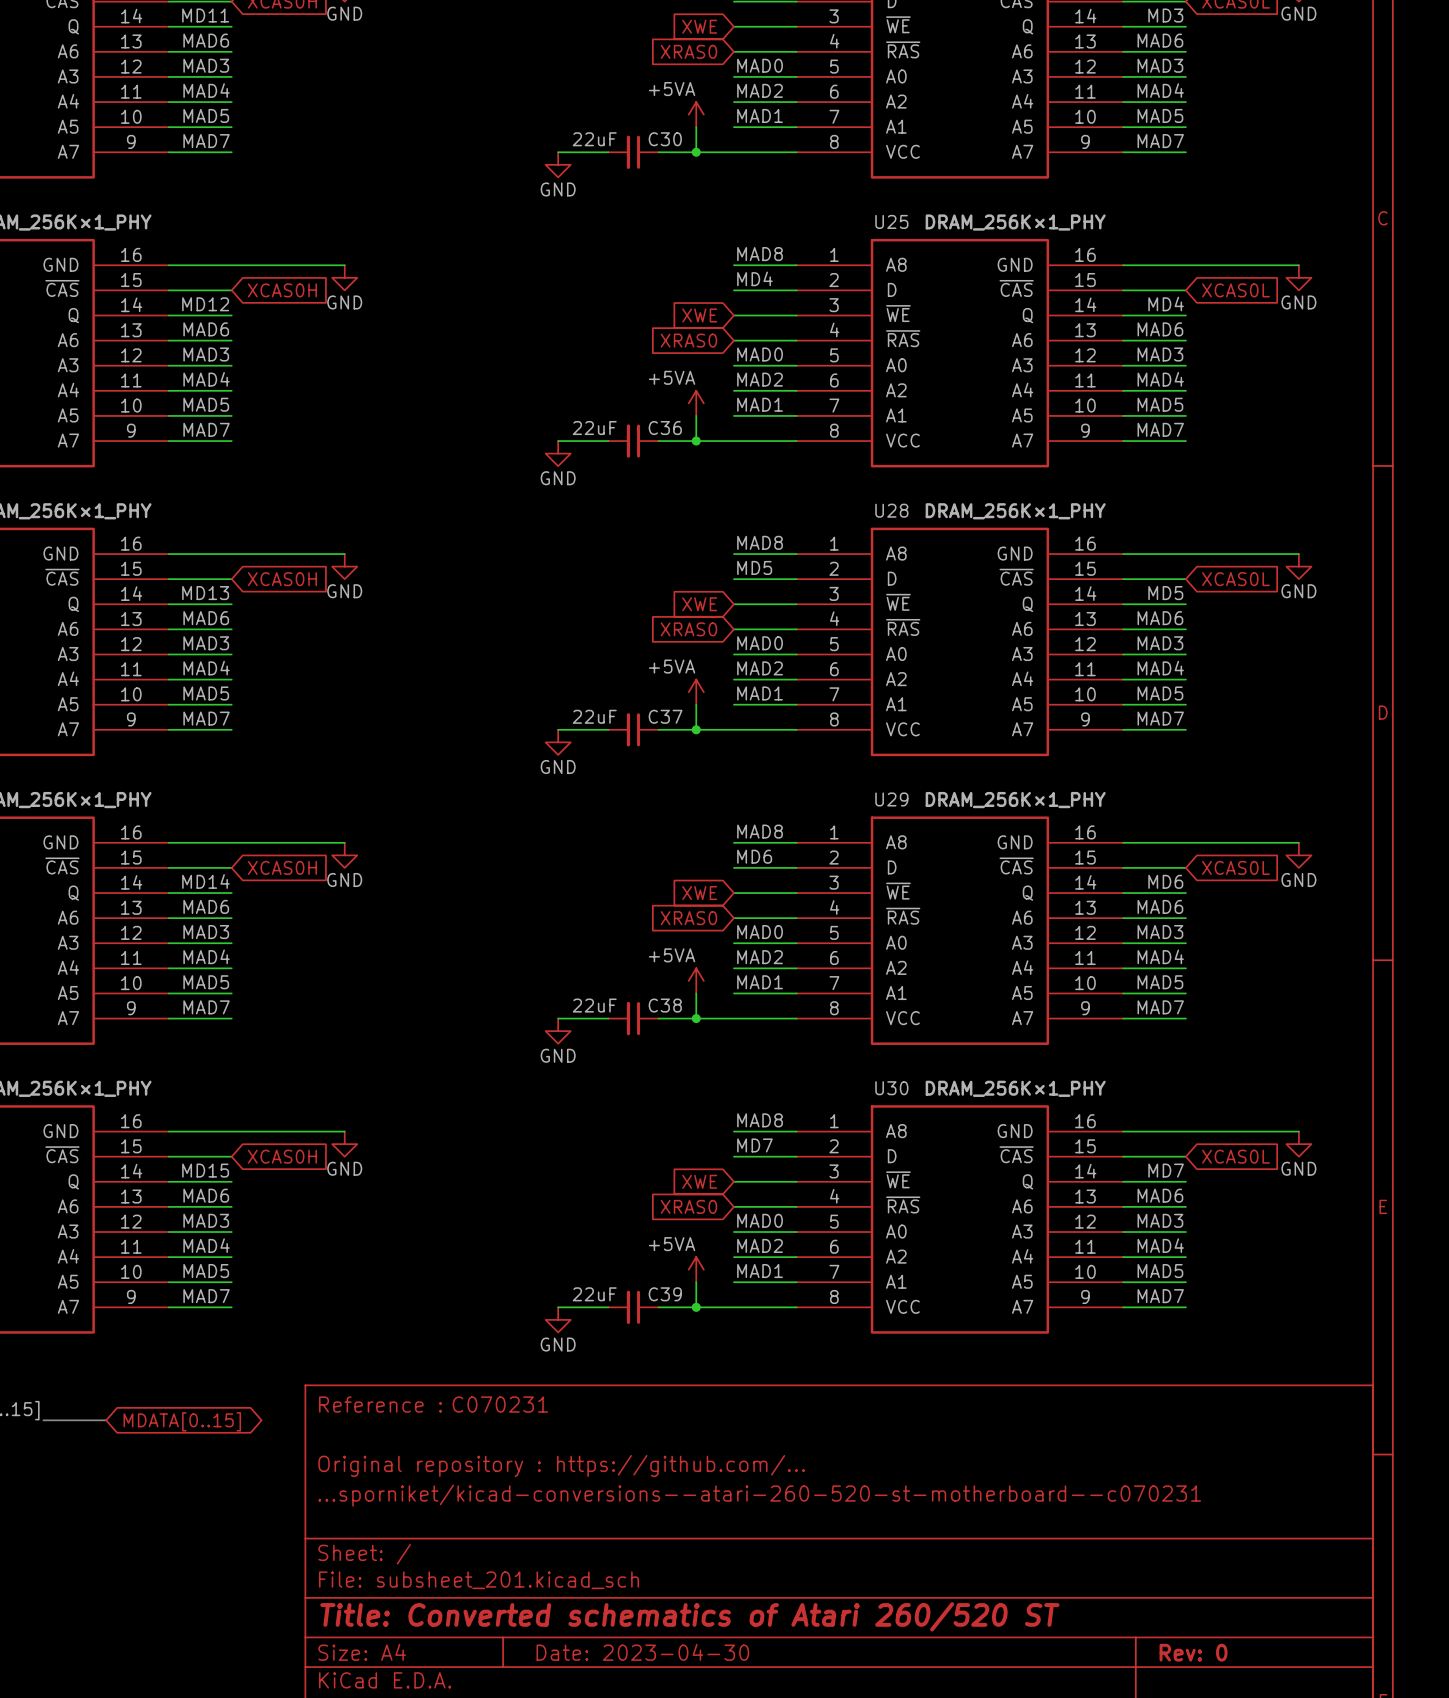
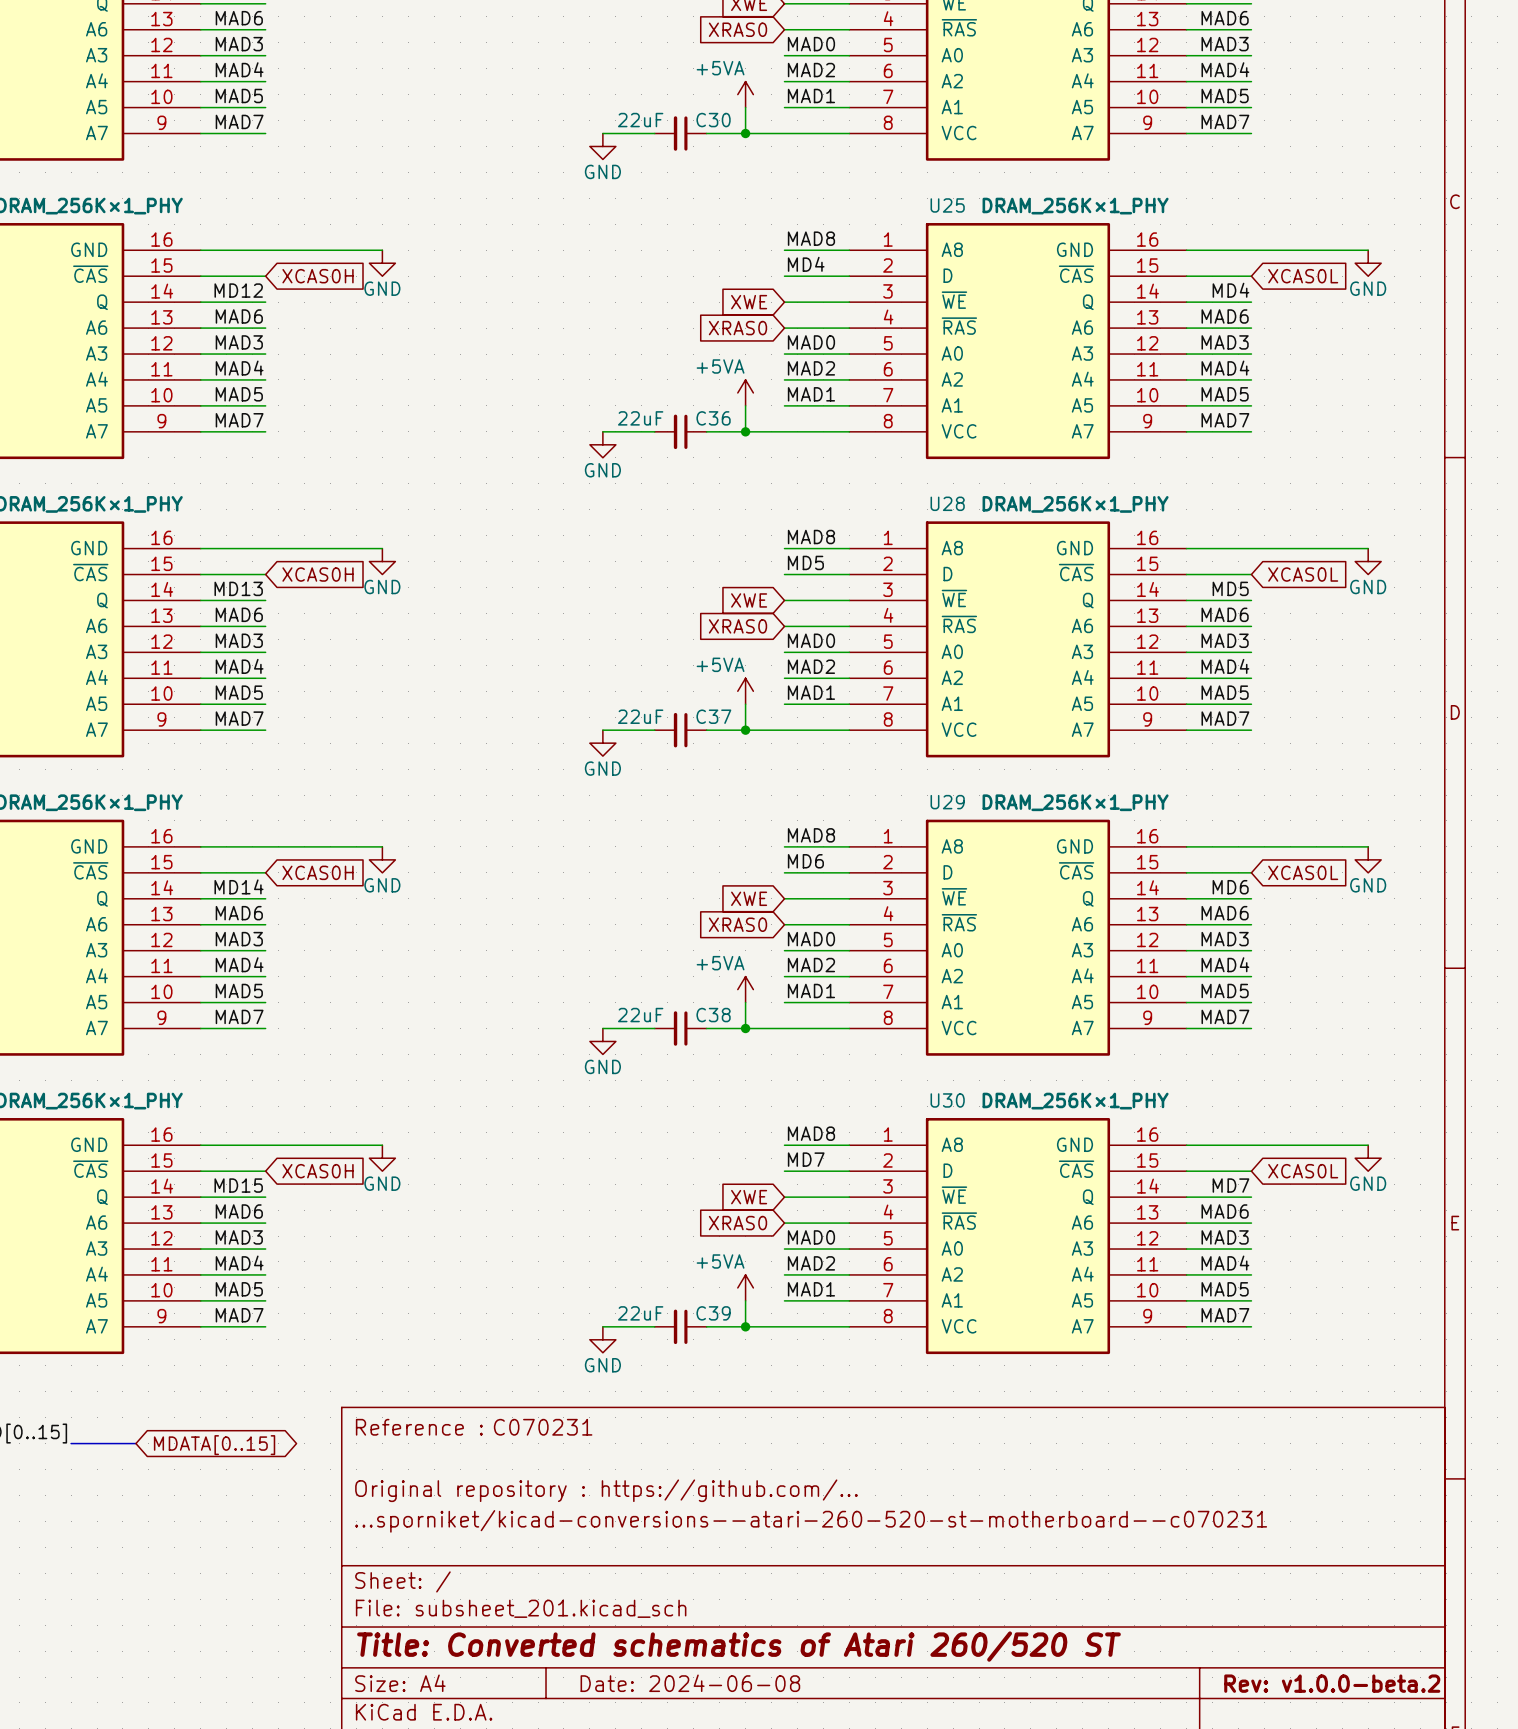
title block: Date: 2023-04-30 (642, 1652) -> Date: 2024-06-08 (690, 1683)
title block: Rev: 0 (1193, 1652) -> Rev: v1.0.0-beta.2 (1332, 1683)

